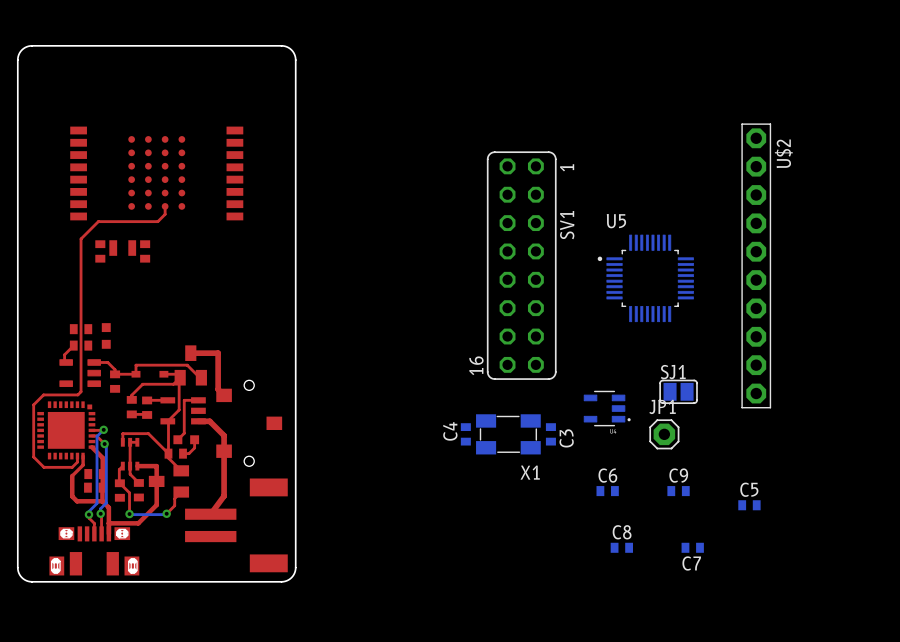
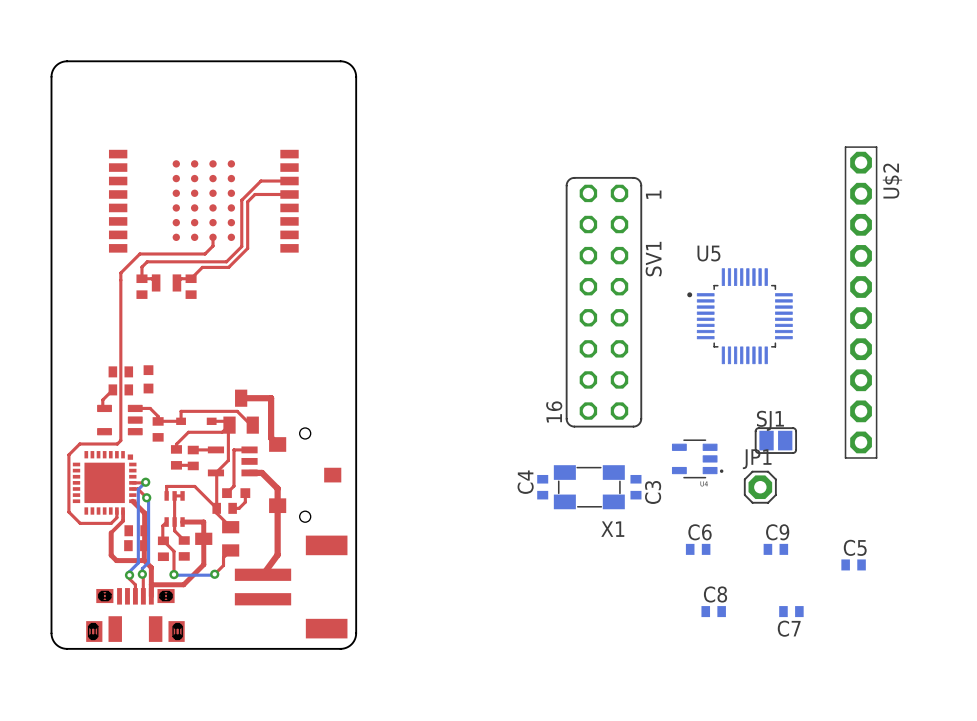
top track: none -> (289, 181) (261, 181) (241, 200) (241, 246) (226, 261) (147, 261) (141, 267) (141, 278) (151, 278) (156, 282)
top track: none -> (289, 194) (255, 194) (247, 201) (247, 248) (228, 267) (202, 267) (191, 278) (181, 278) (176, 282)

